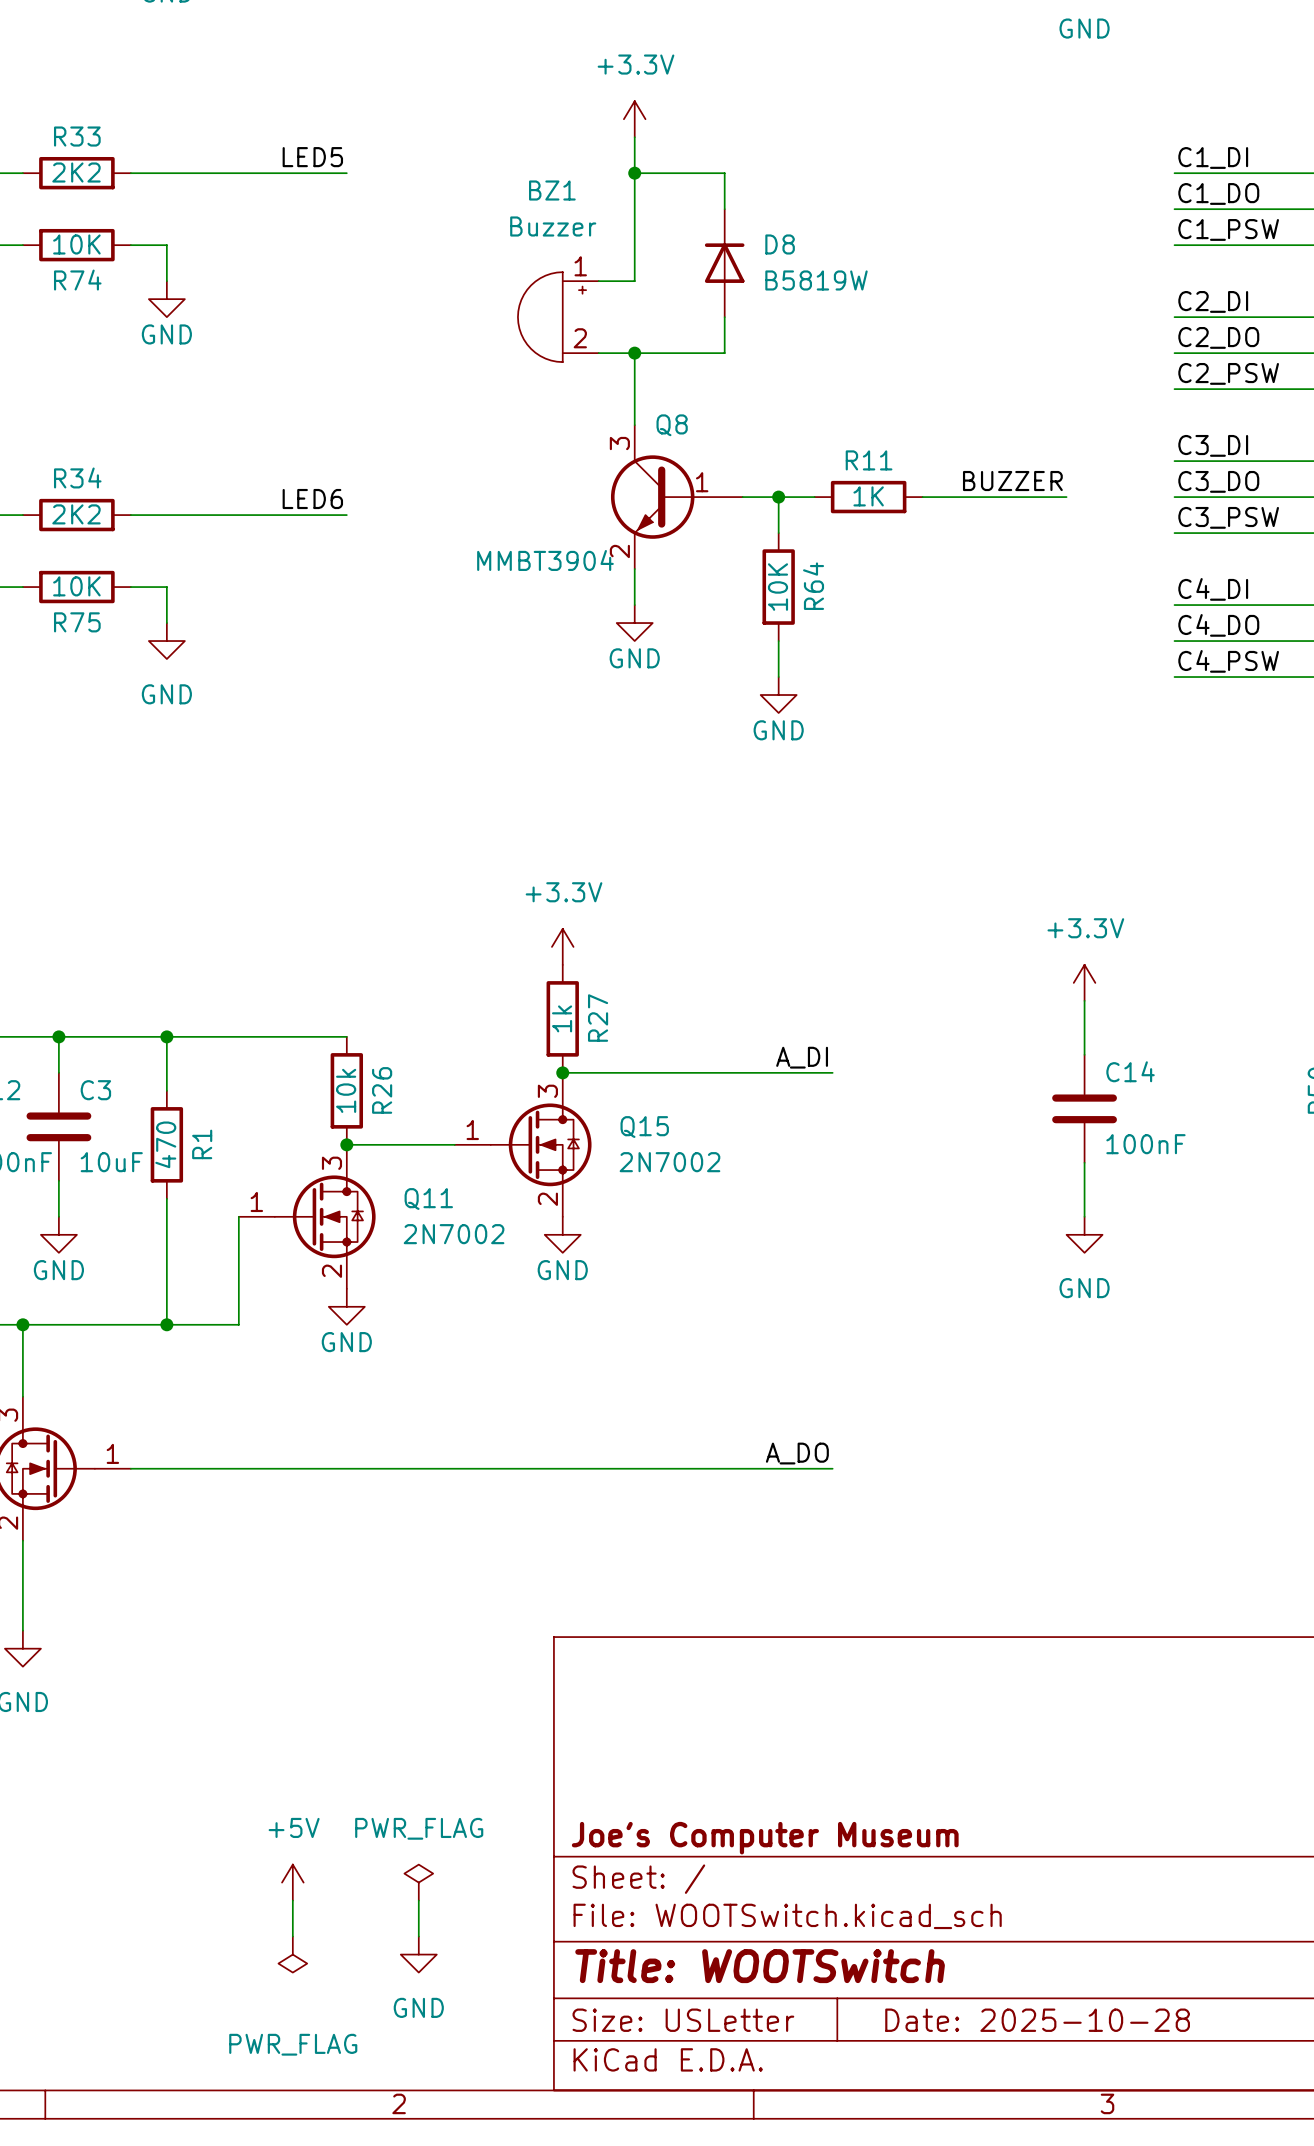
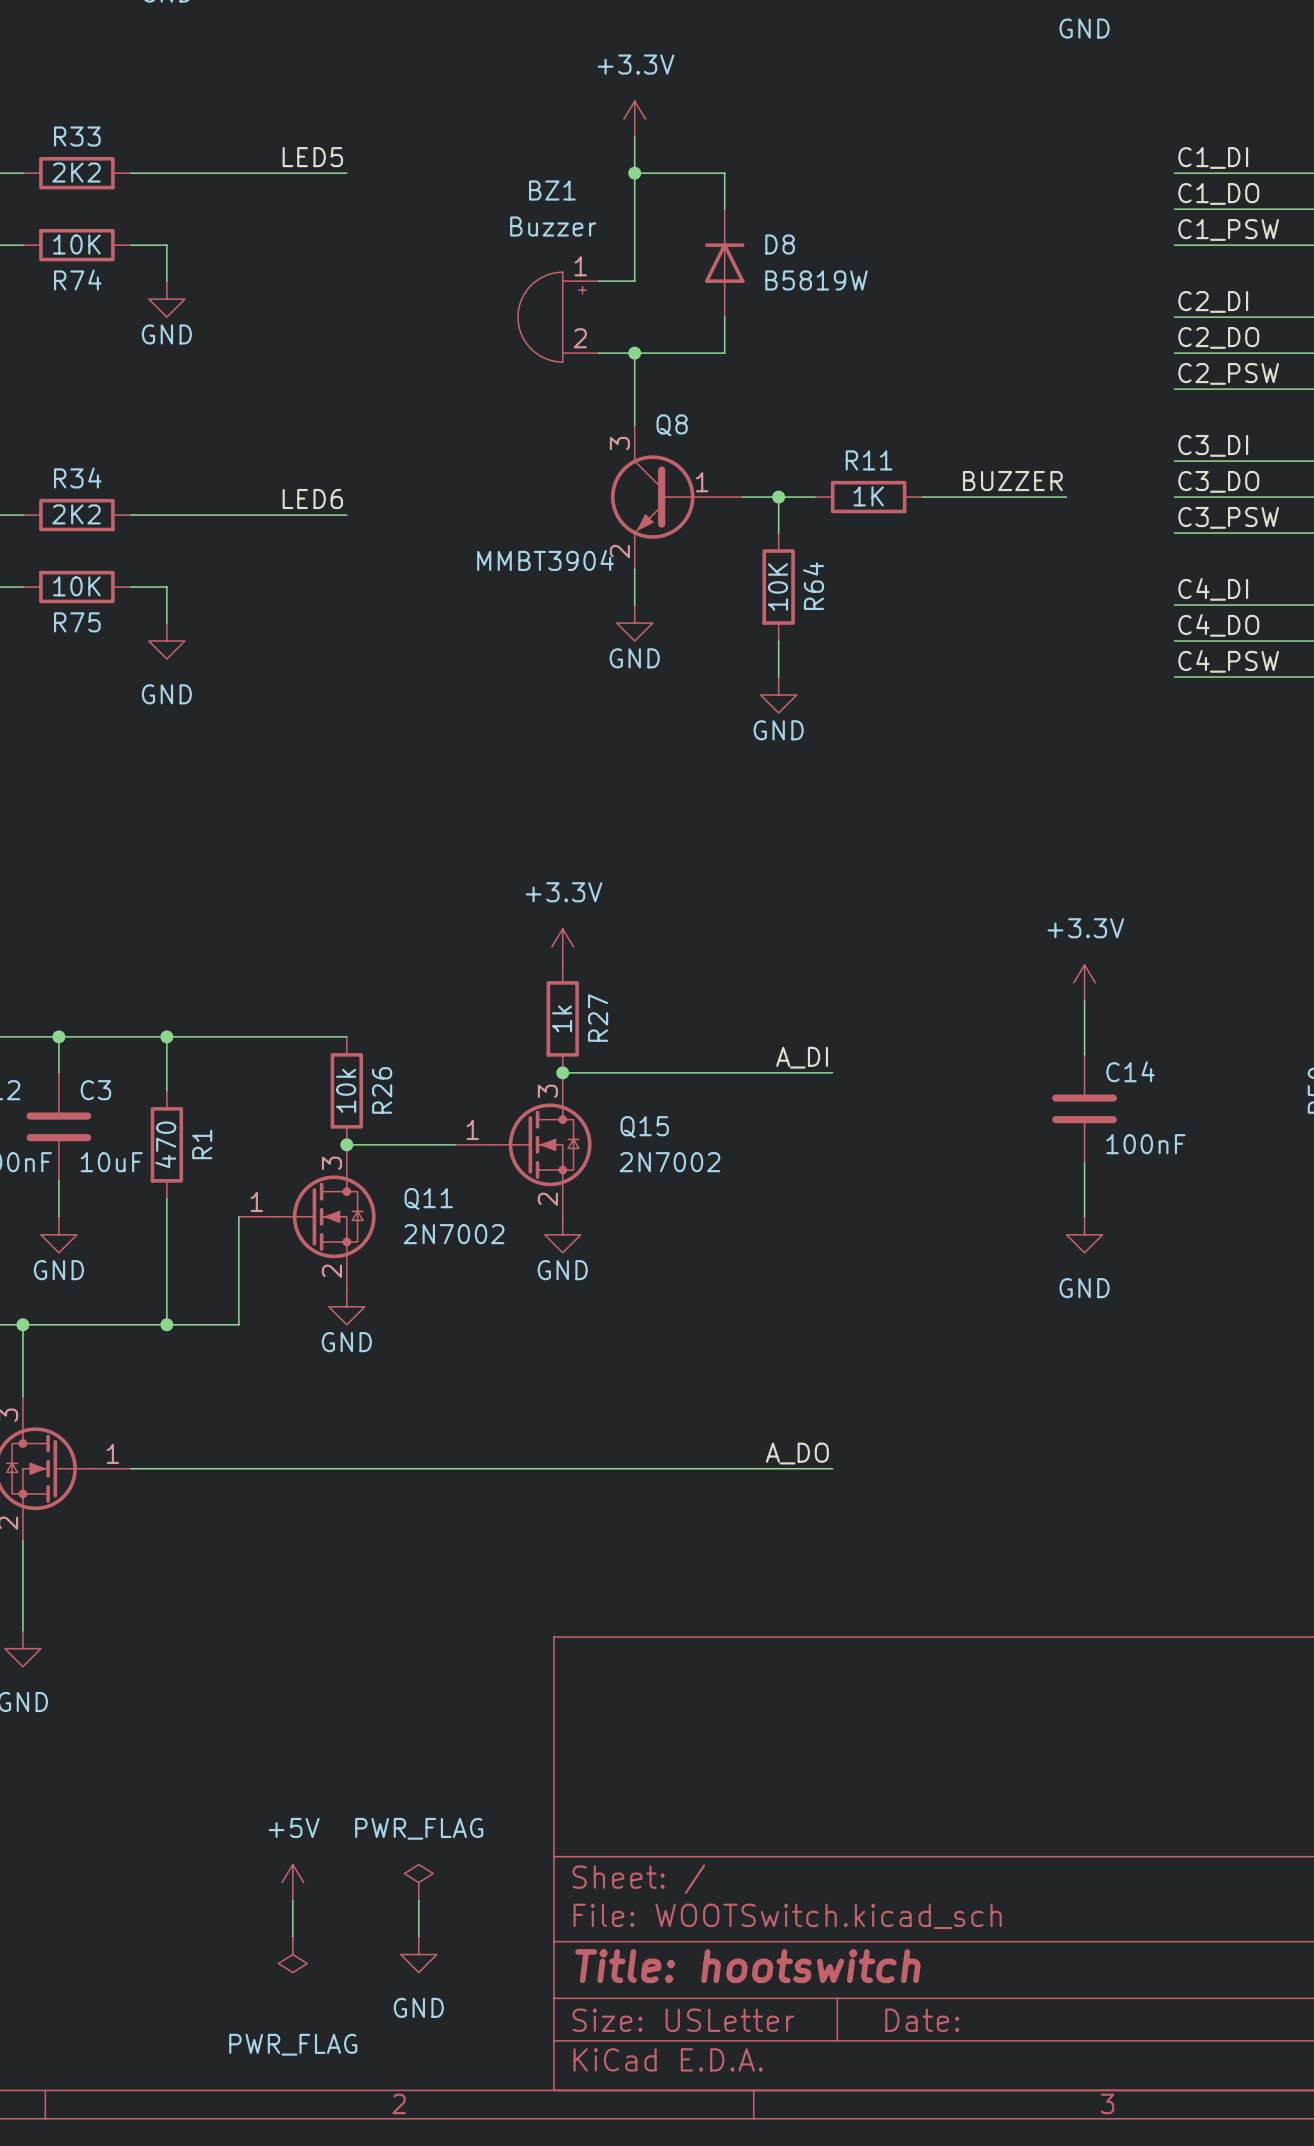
title block: Joe's Computer Museum (765, 1838) -> none
title block: Title: WOOTSwitch (760, 1966) -> Title: hootswitch (747, 1966)
title block: Date: 2025-10-28 (1037, 2020) -> Date: (922, 2020)

